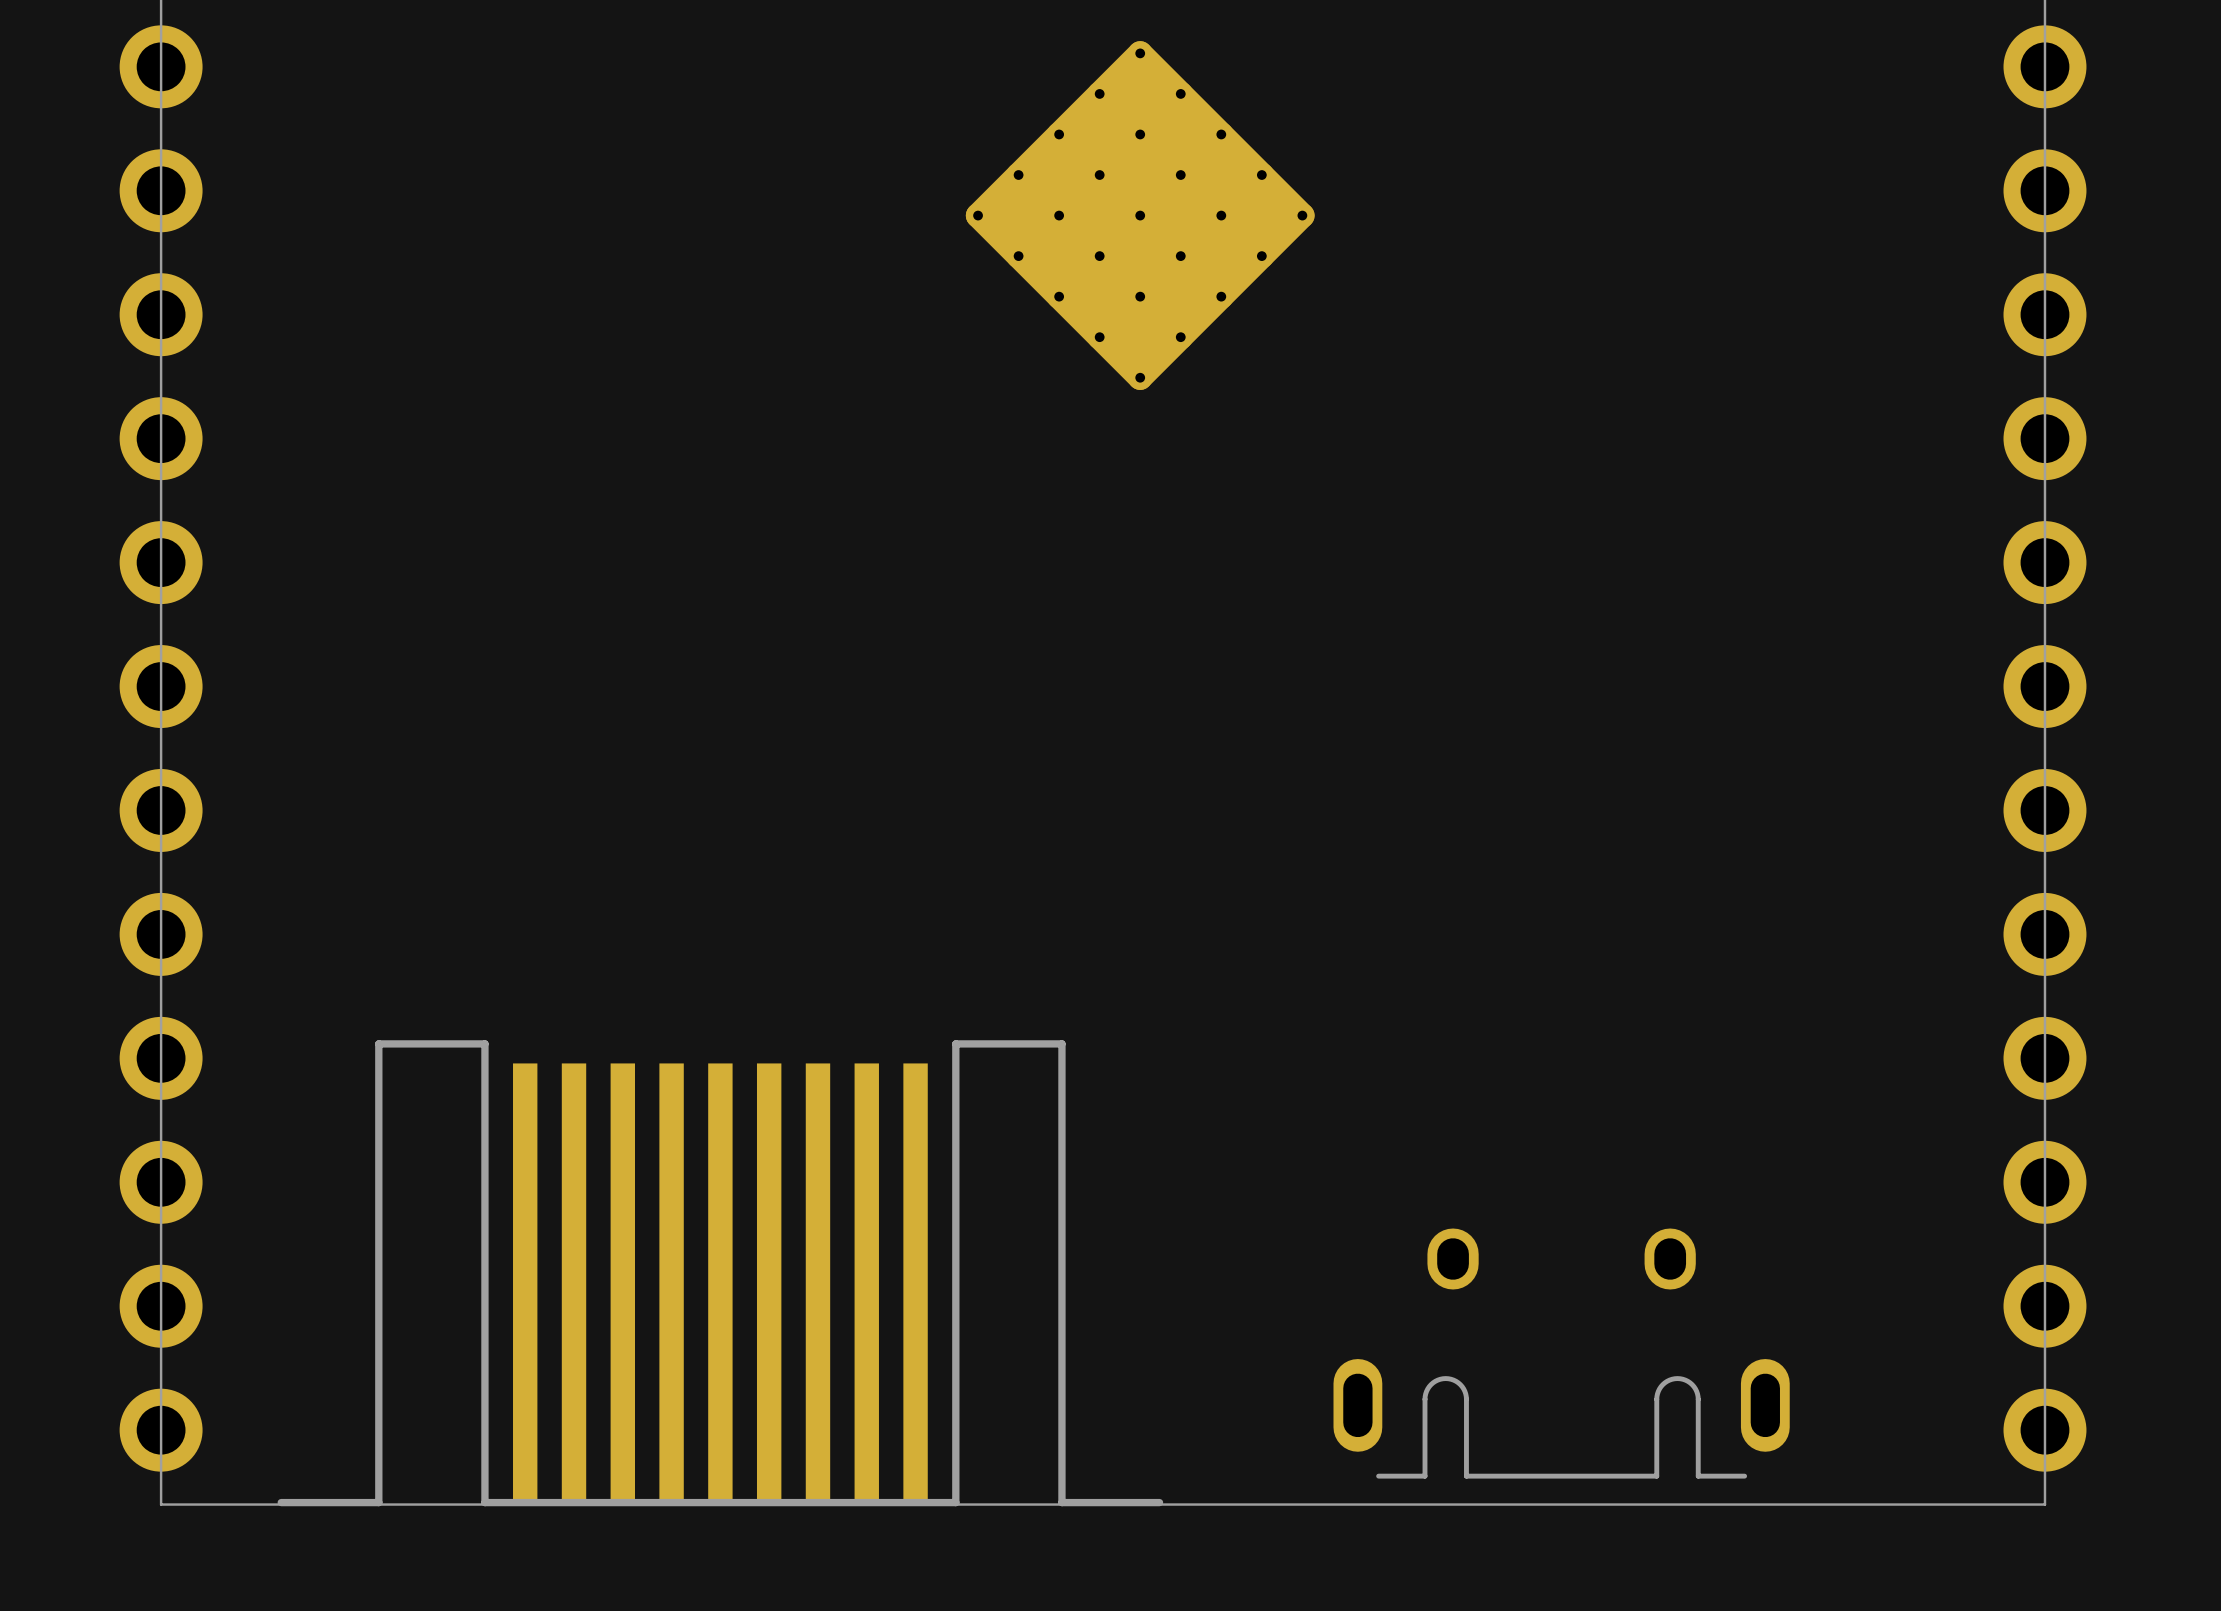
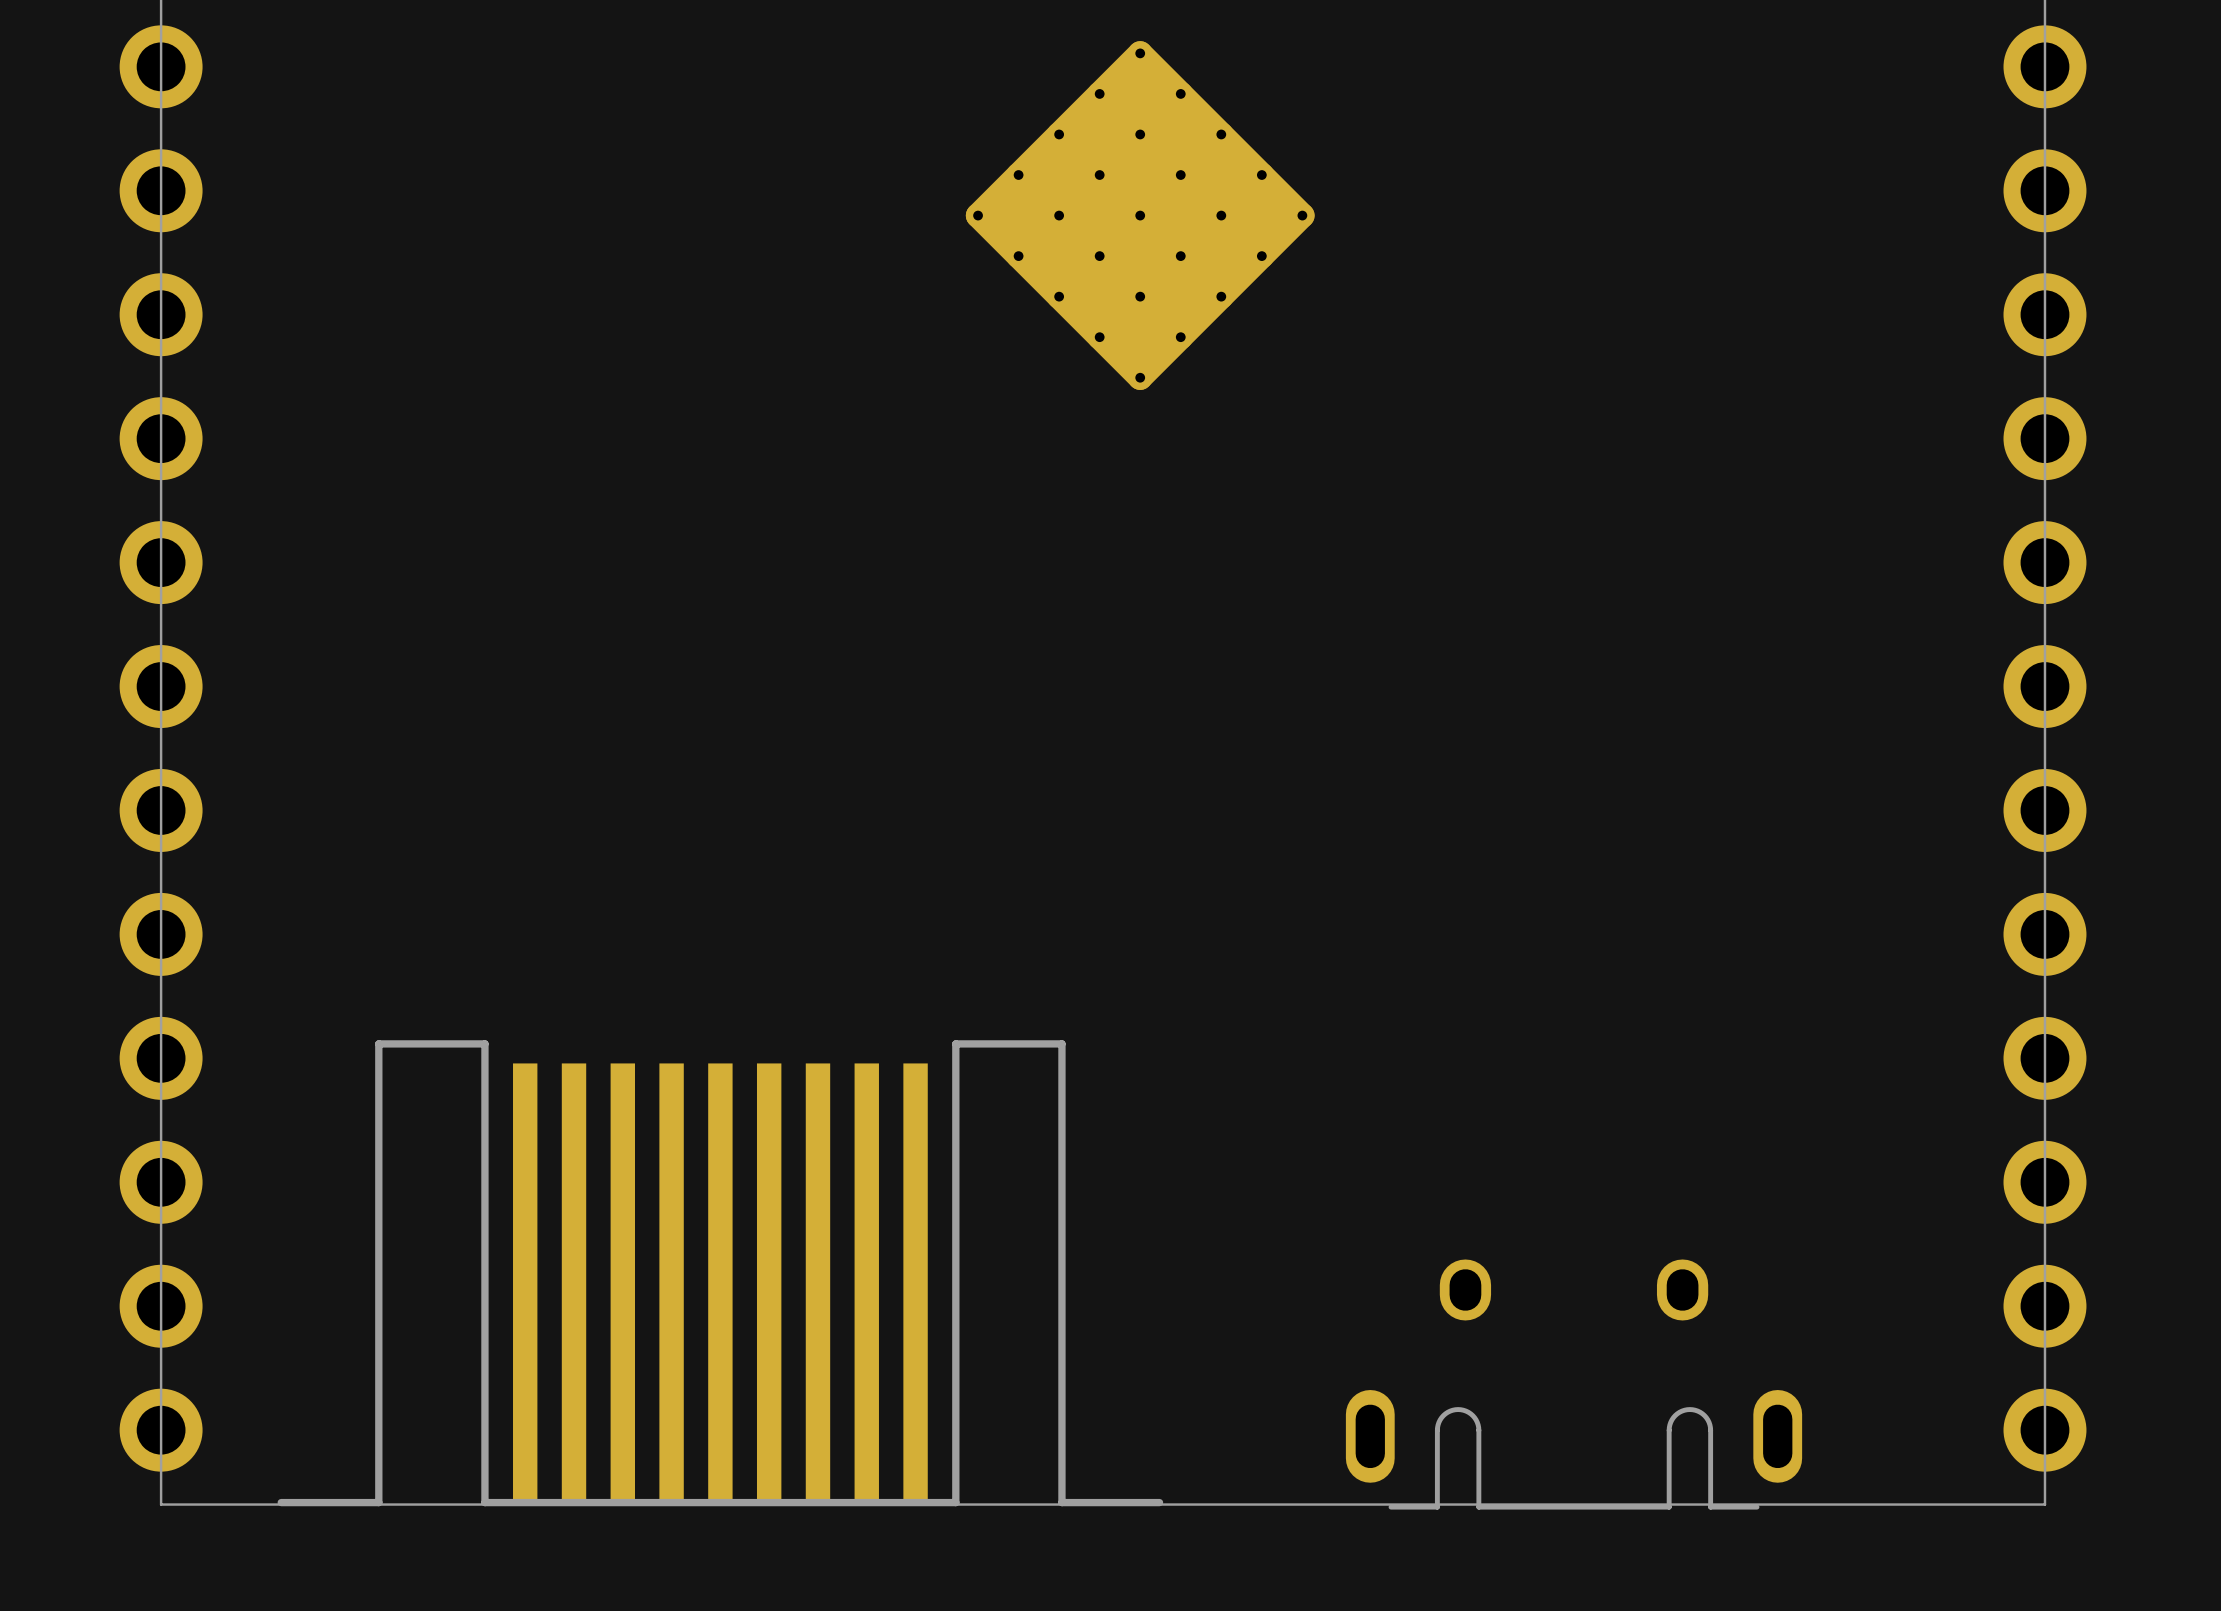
part position: (1561, 1353) -> (1574, 1384)

